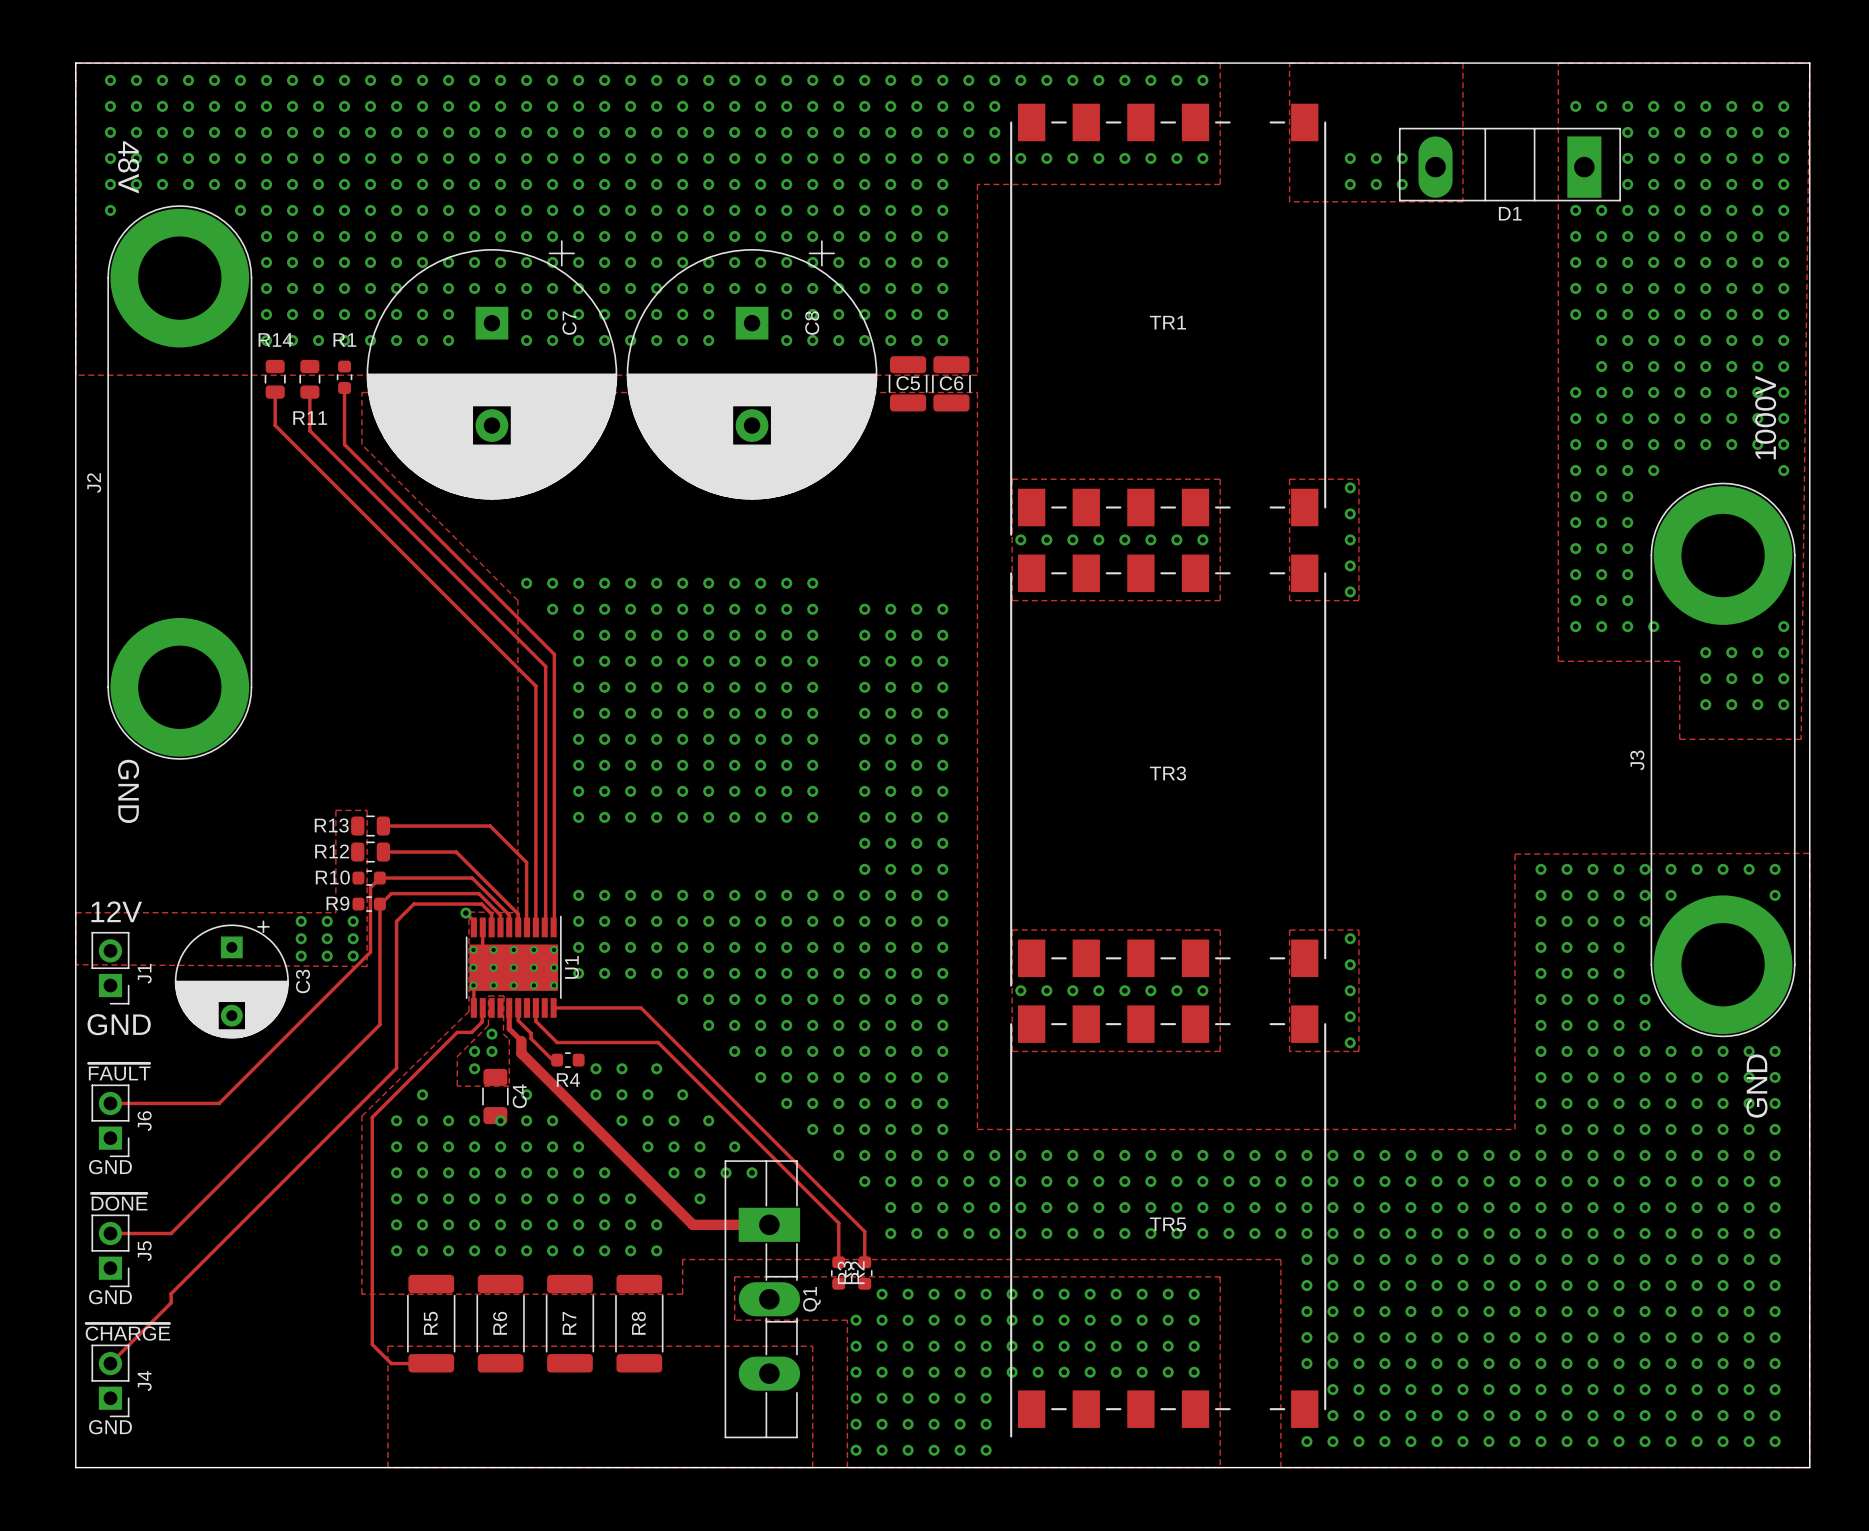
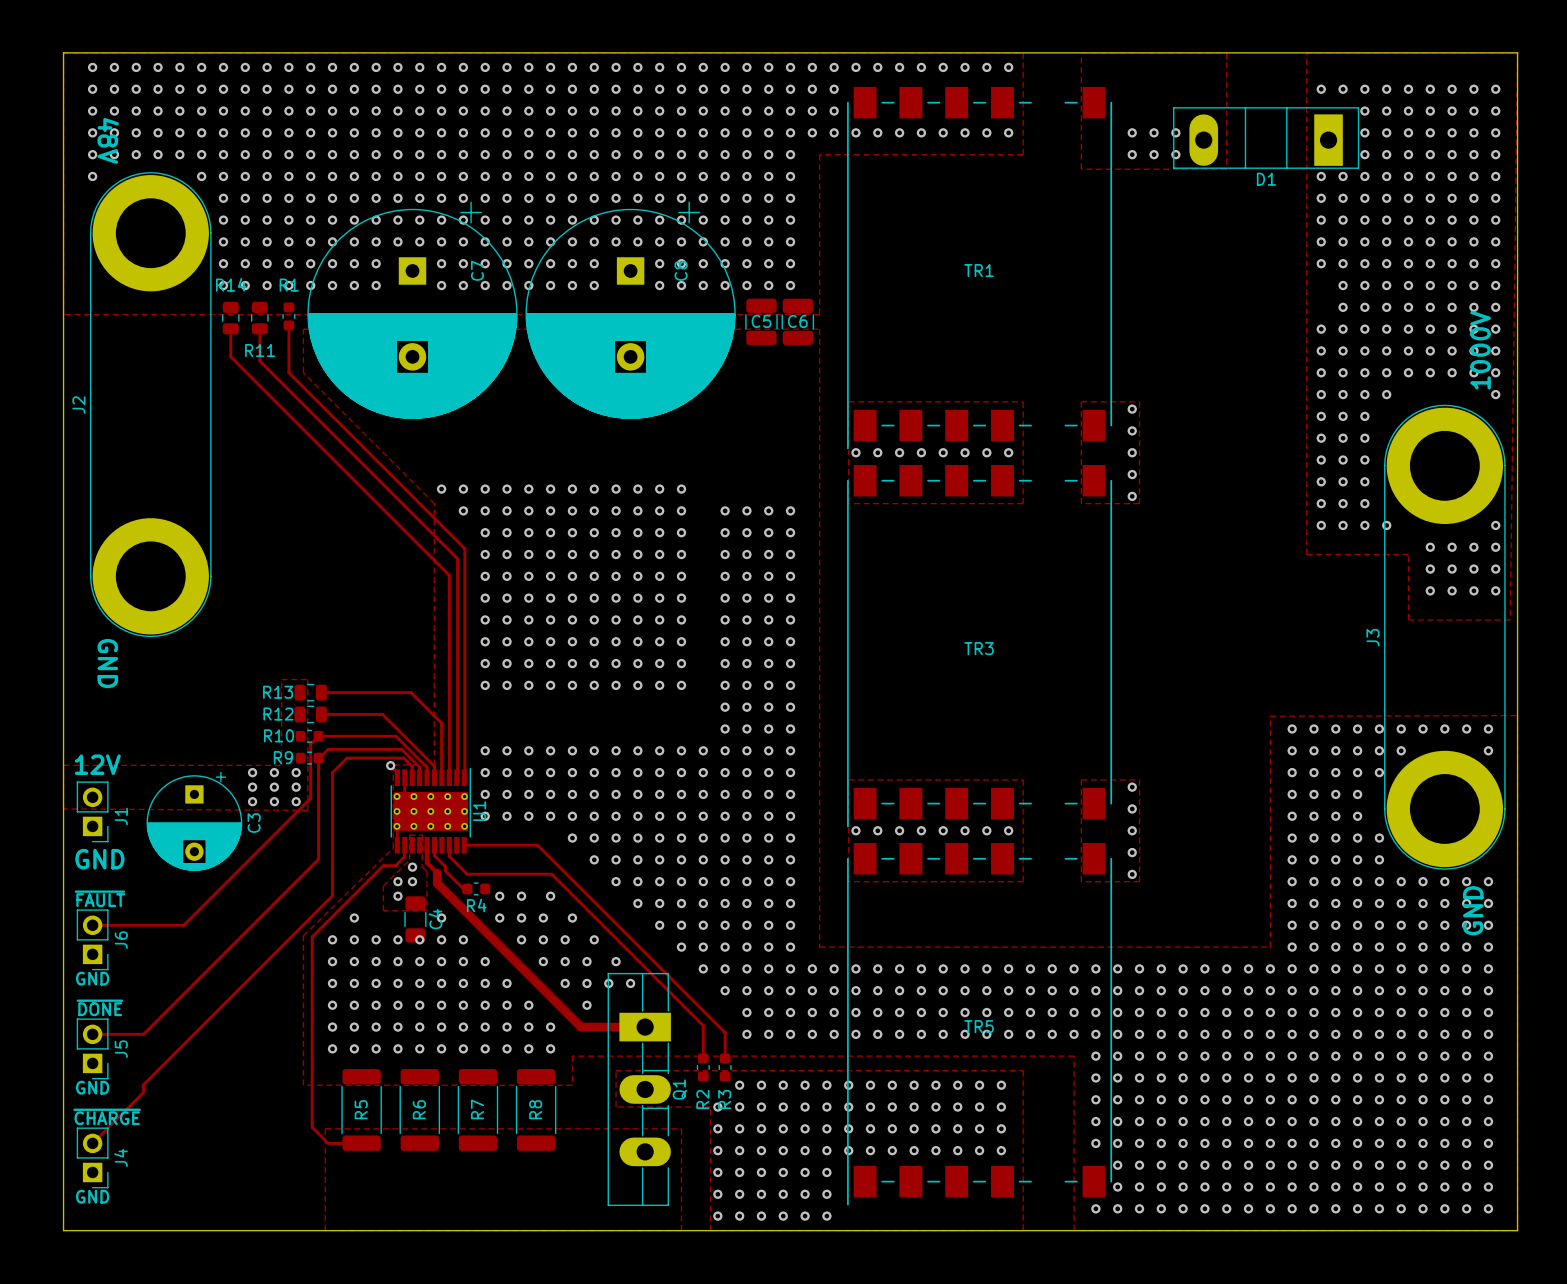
R3 name position: R3 (844, 1272) -> R3 (724, 1099)
R2 name position: R2 (857, 1272) -> R2 (702, 1099)

